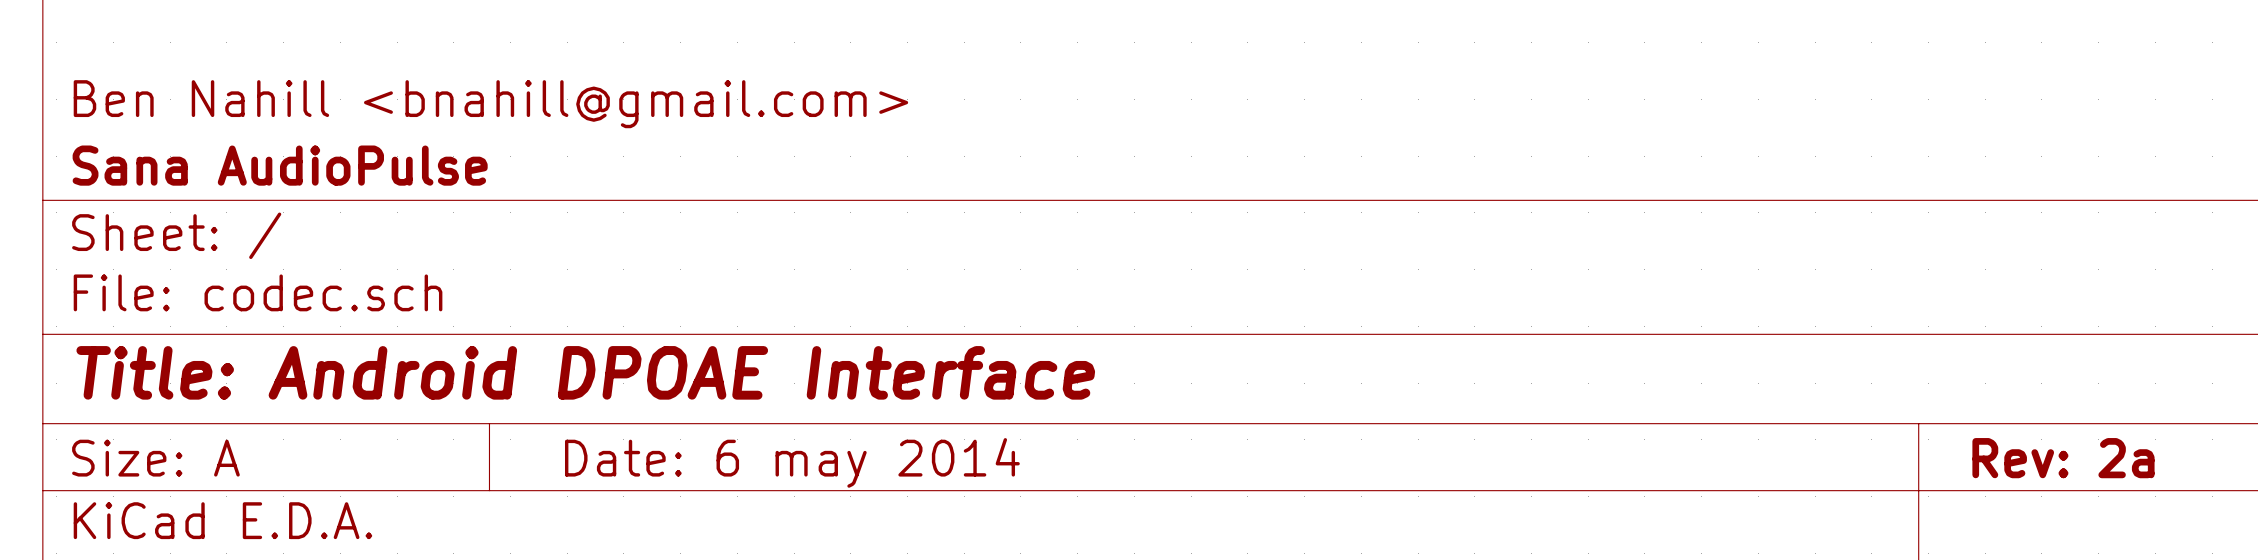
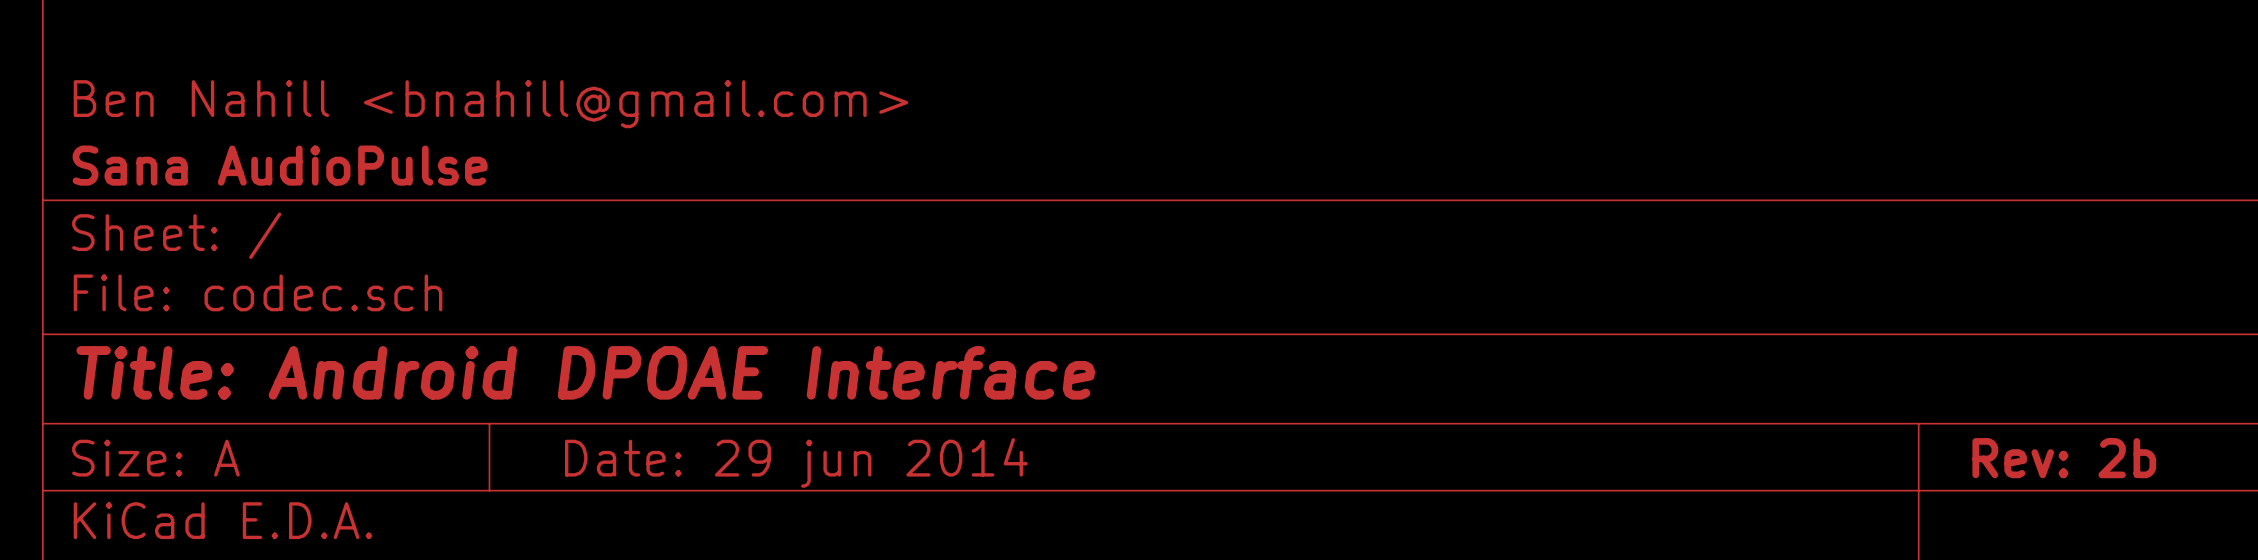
title block: Rev: 2a (2063, 458) -> Rev: 2b (2064, 458)
title block: Date: 6 may 2014 (792, 462) -> Date: 29 jun 2014 (796, 462)

